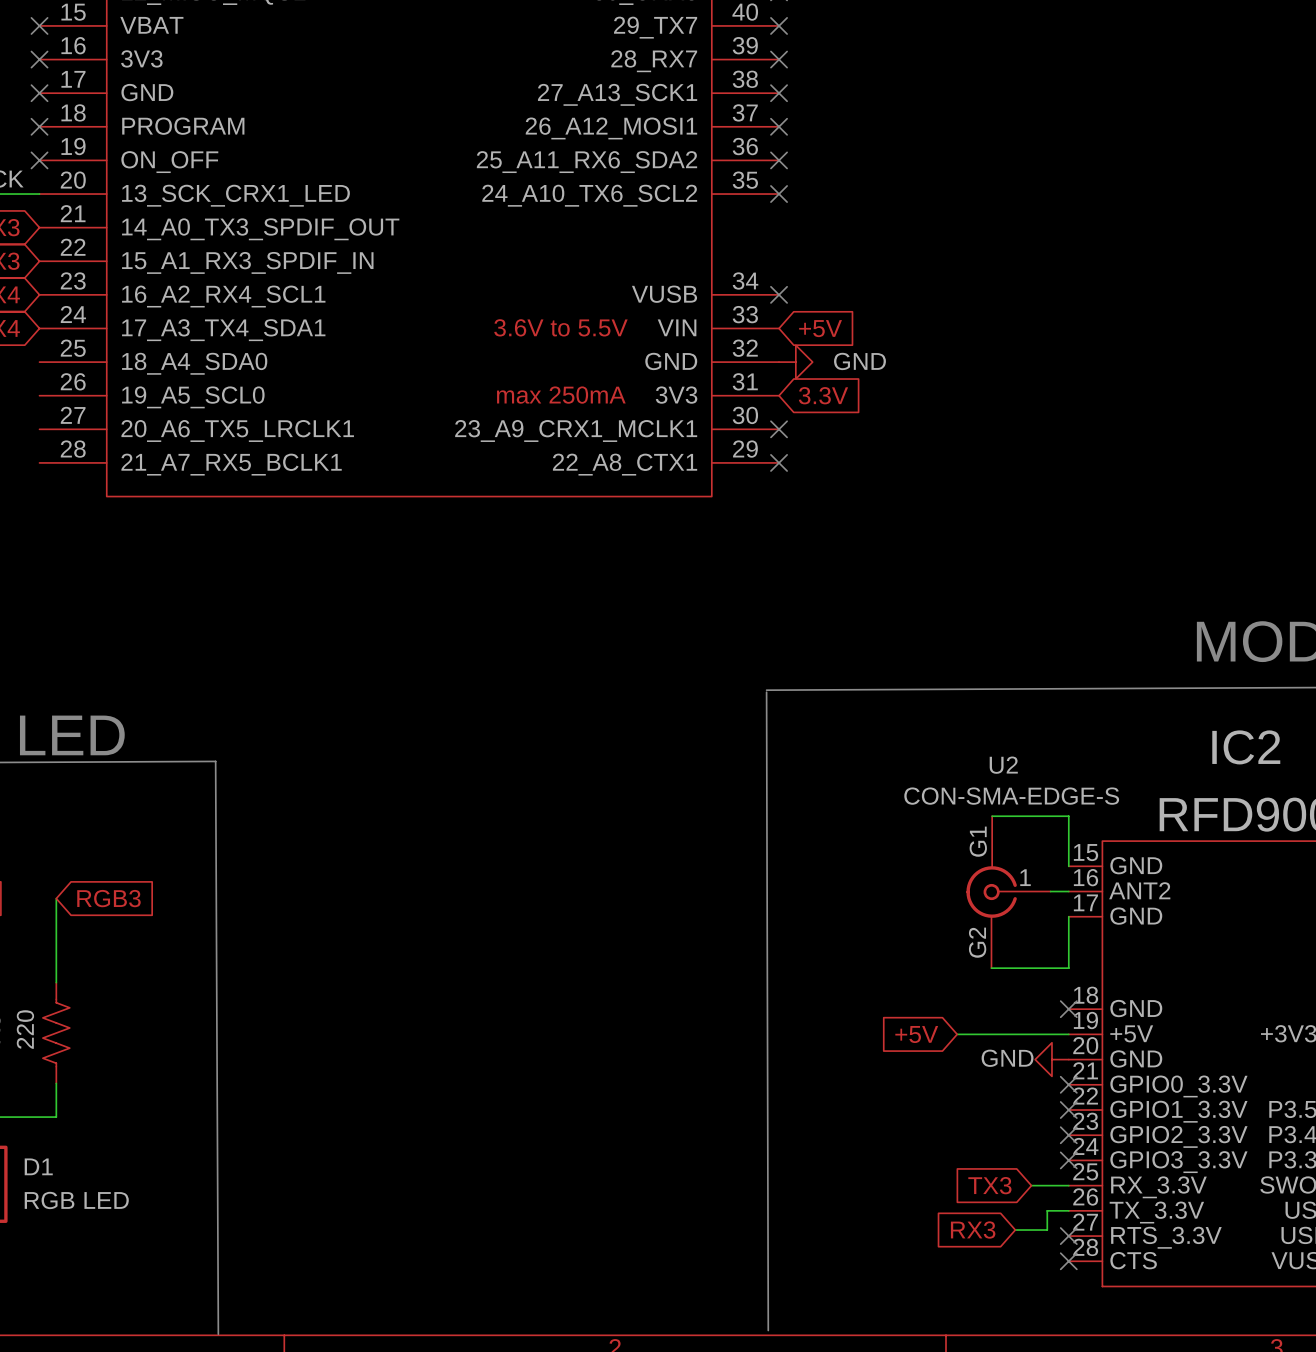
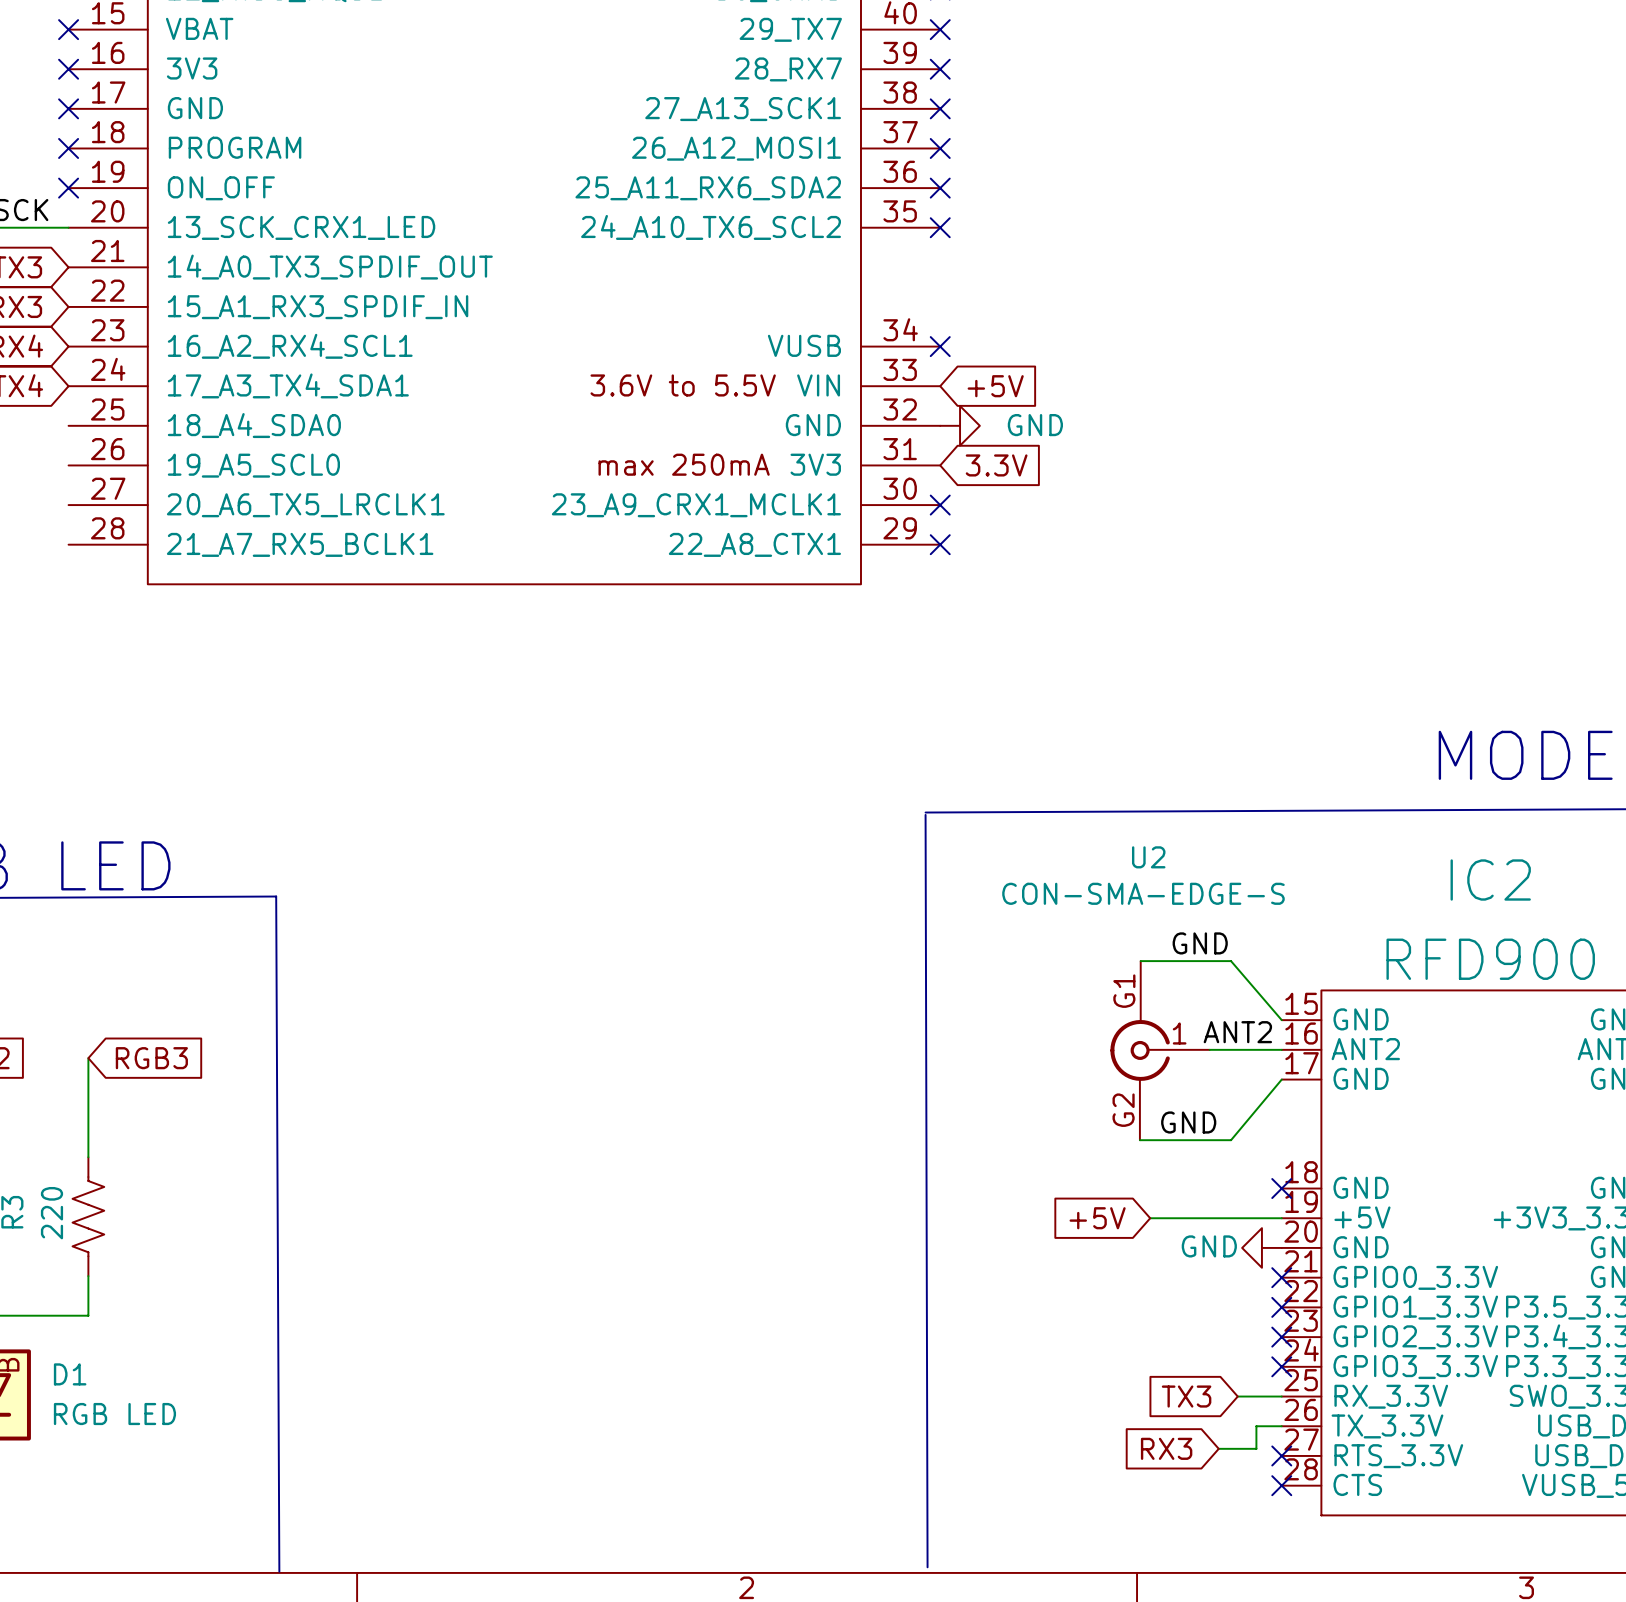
U2 name position: U2 (1003, 765) -> U2 (1148, 857)
U2 value position: CON-SMA-EDGE-S (1011, 796) -> CON-SMA-EDGE-S (1143, 893)
label: none -> GND (1200, 943)
wire: none -> (1140, 961) (1191, 961)
wire: (1025, 816) (1068, 816) (1068, 866) -> (1231, 961) (1281, 1020)
label: none -> ANT2 (1237, 1032)
U2 position: (1008, 892) -> (1160, 1050)
wire: (1068, 916) (1068, 968) (1025, 968) -> (1281, 1079) (1231, 1140)
label: none -> GND (1188, 1122)
wire: none -> (1139, 1140) (1190, 1140)

